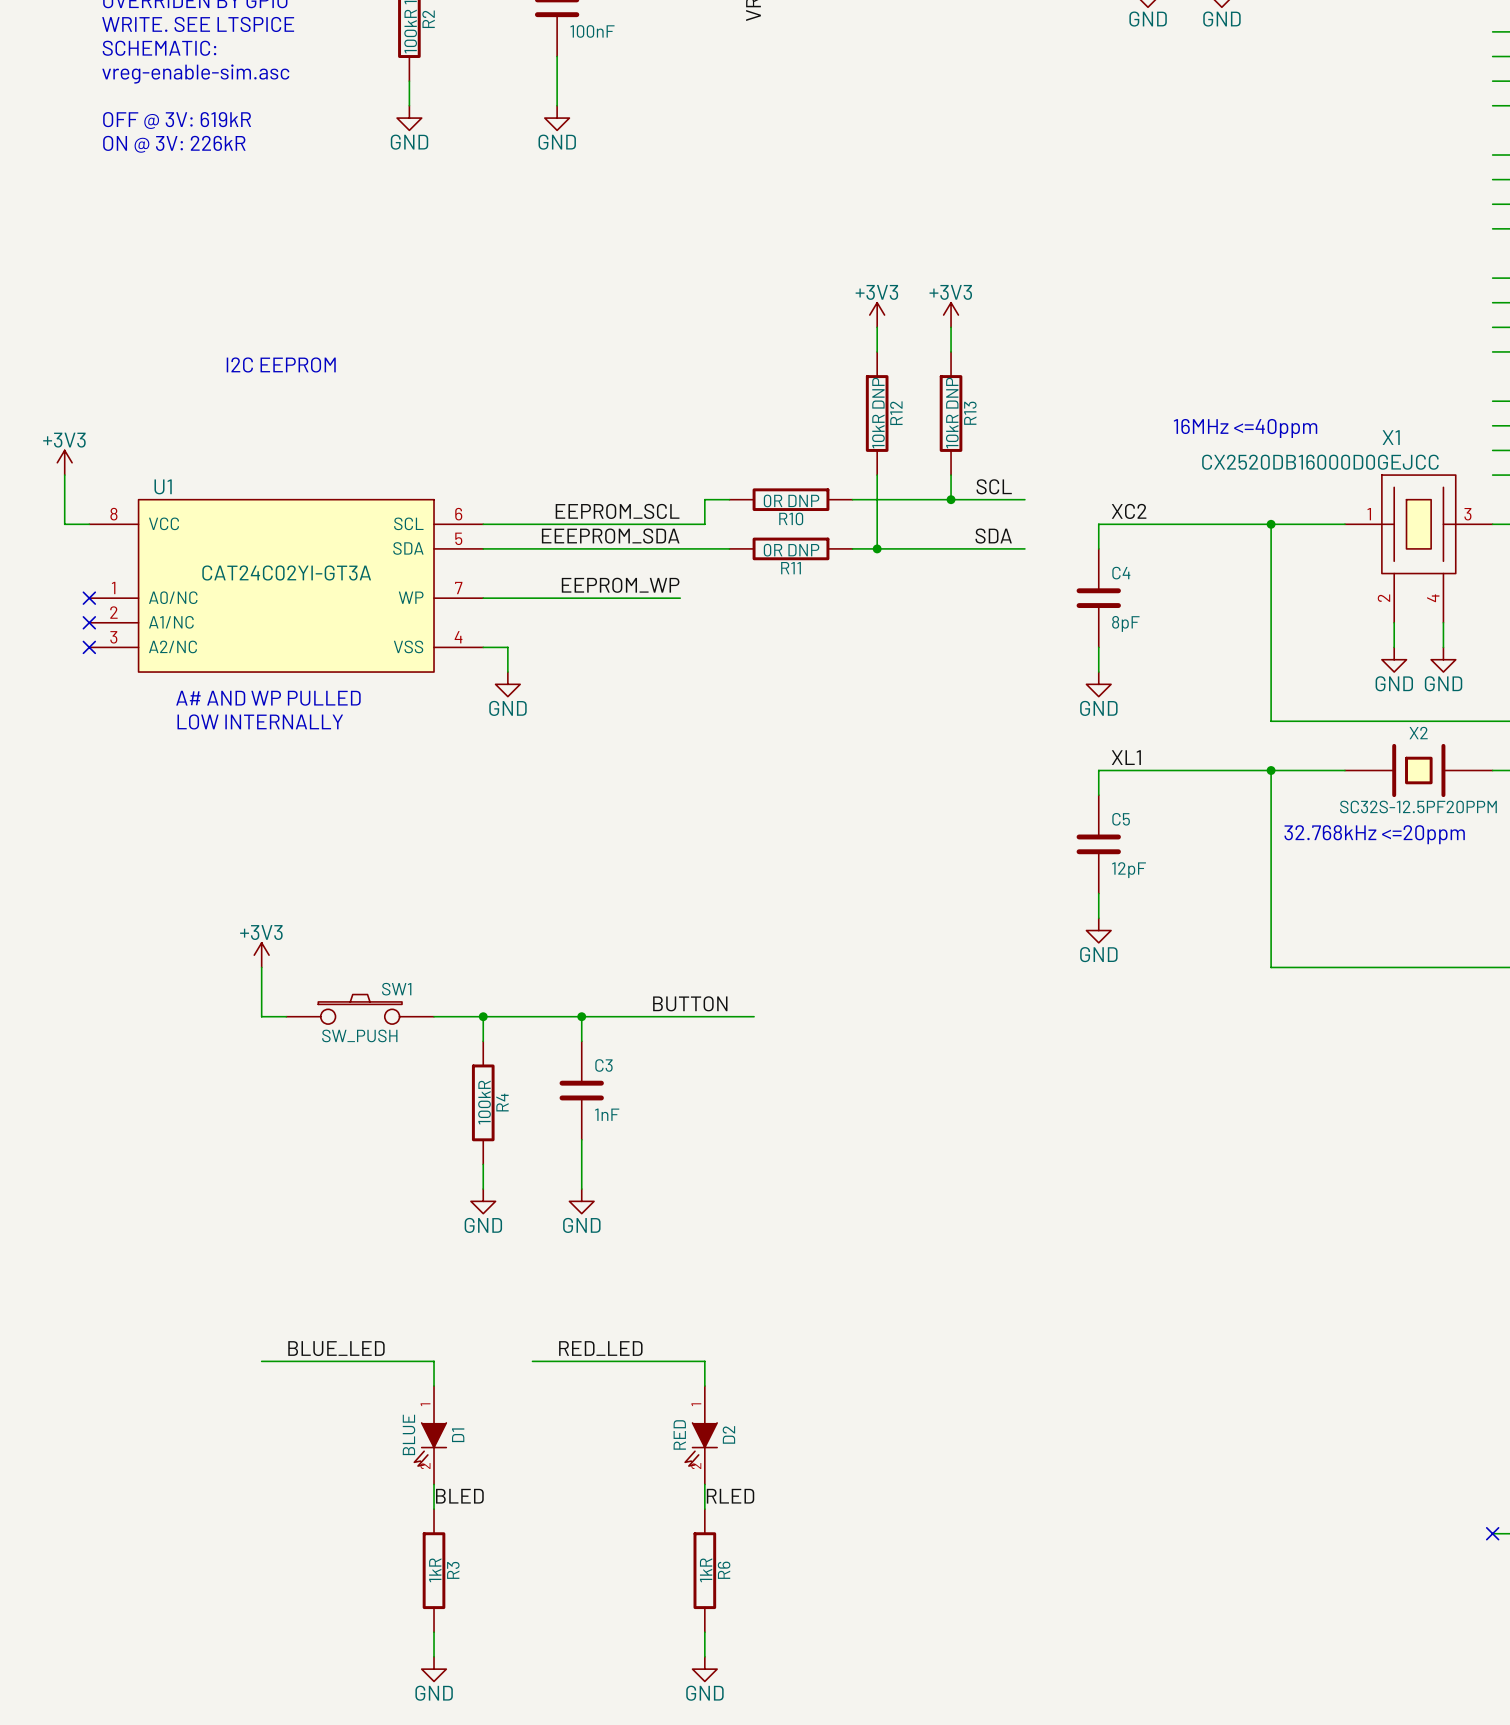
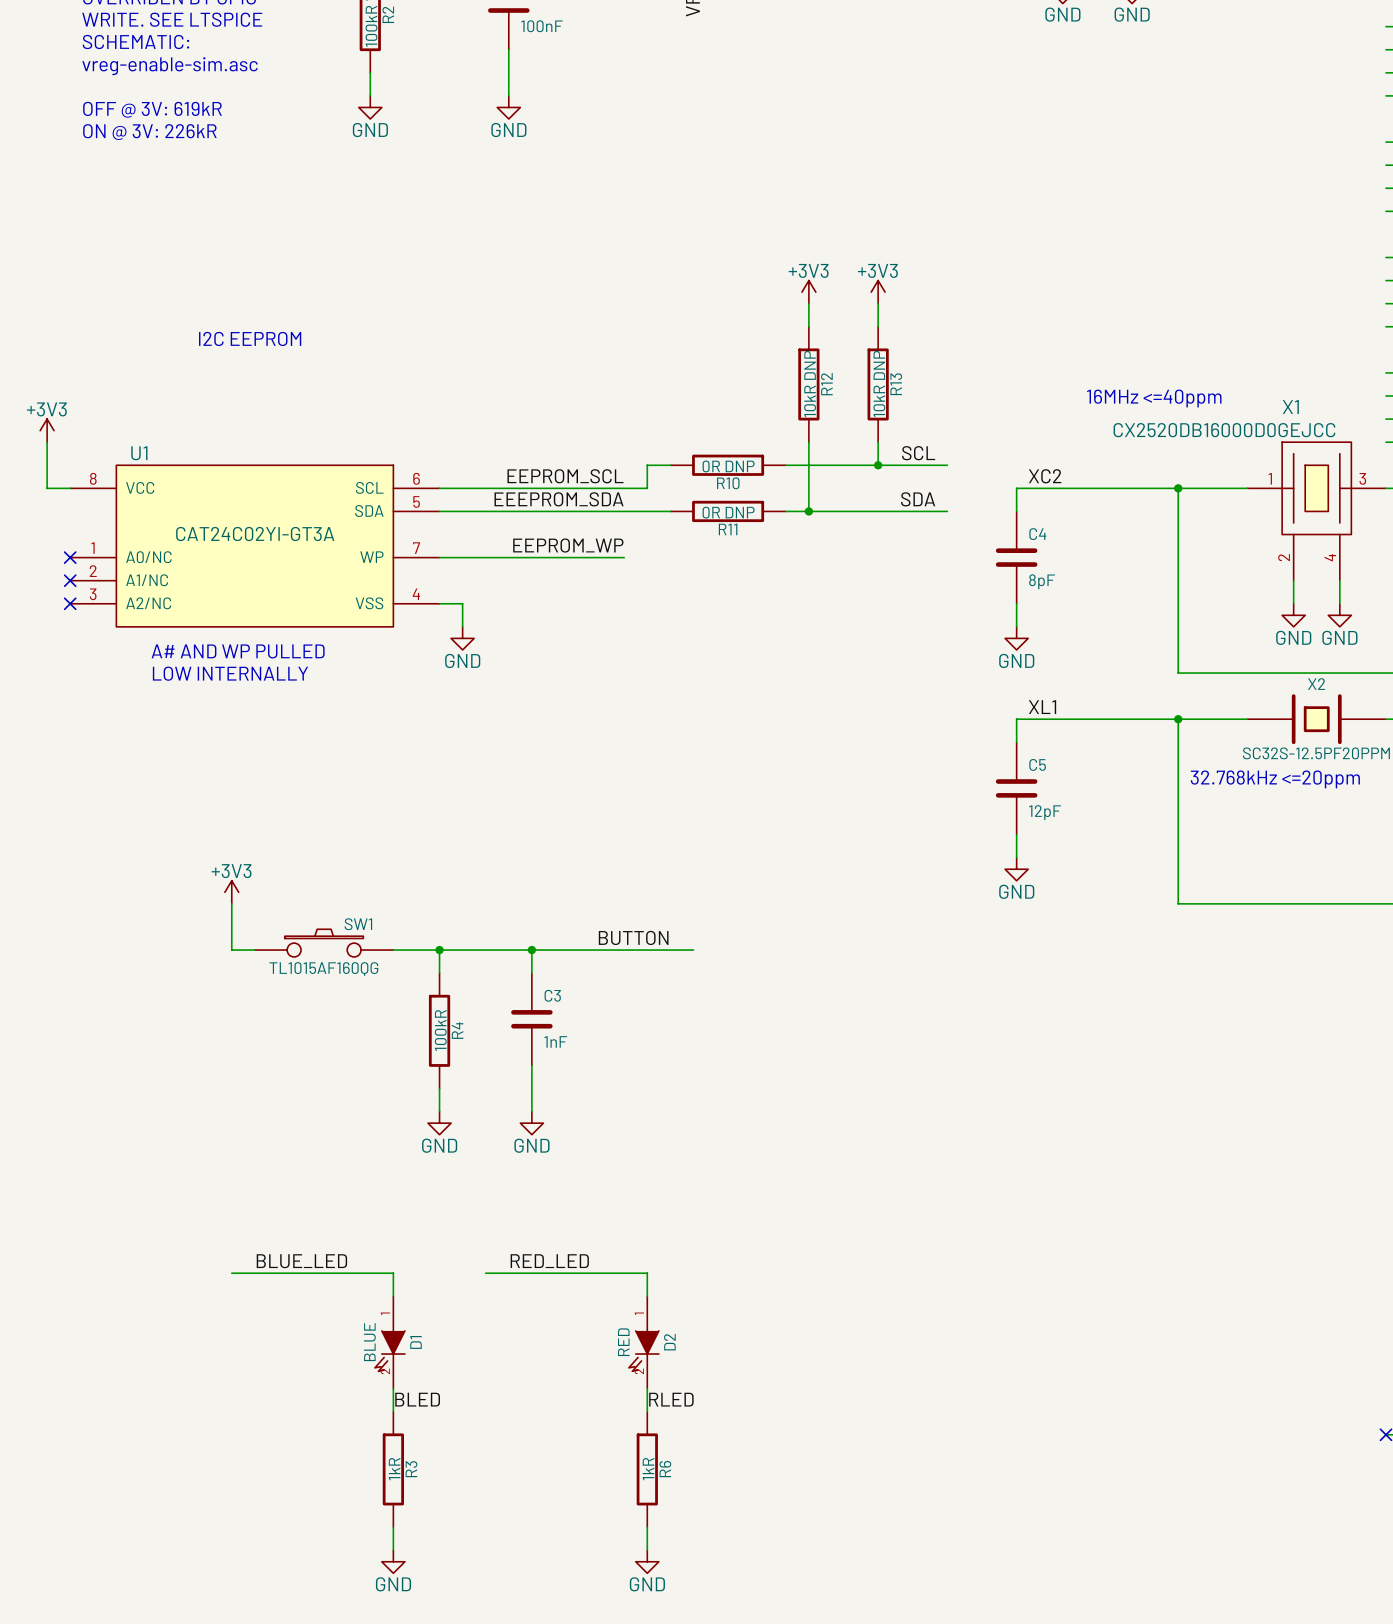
SW1 value: SW_PUSH (359, 1035) -> TL1015AF160QG (323, 968)

